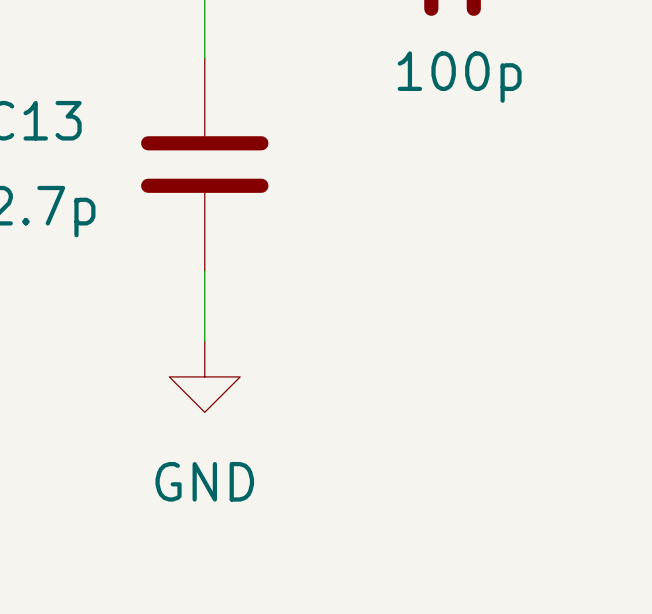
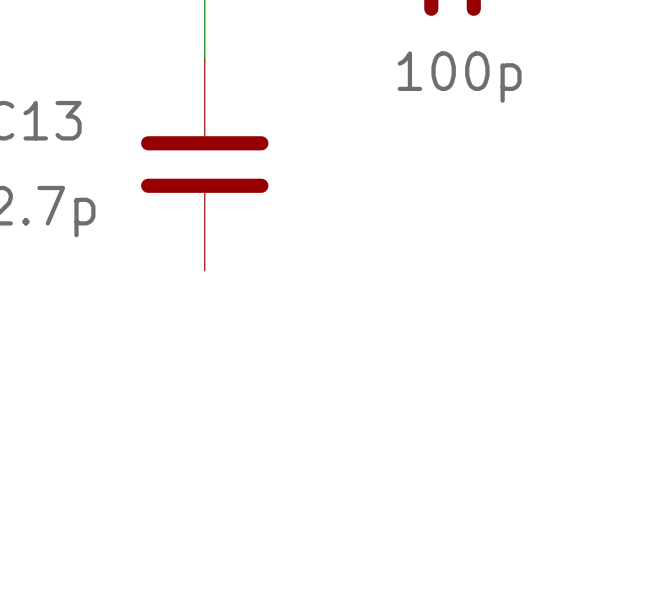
wire: (204, 270) (204, 341) -> none
power symbol: GND (204, 376) -> none

